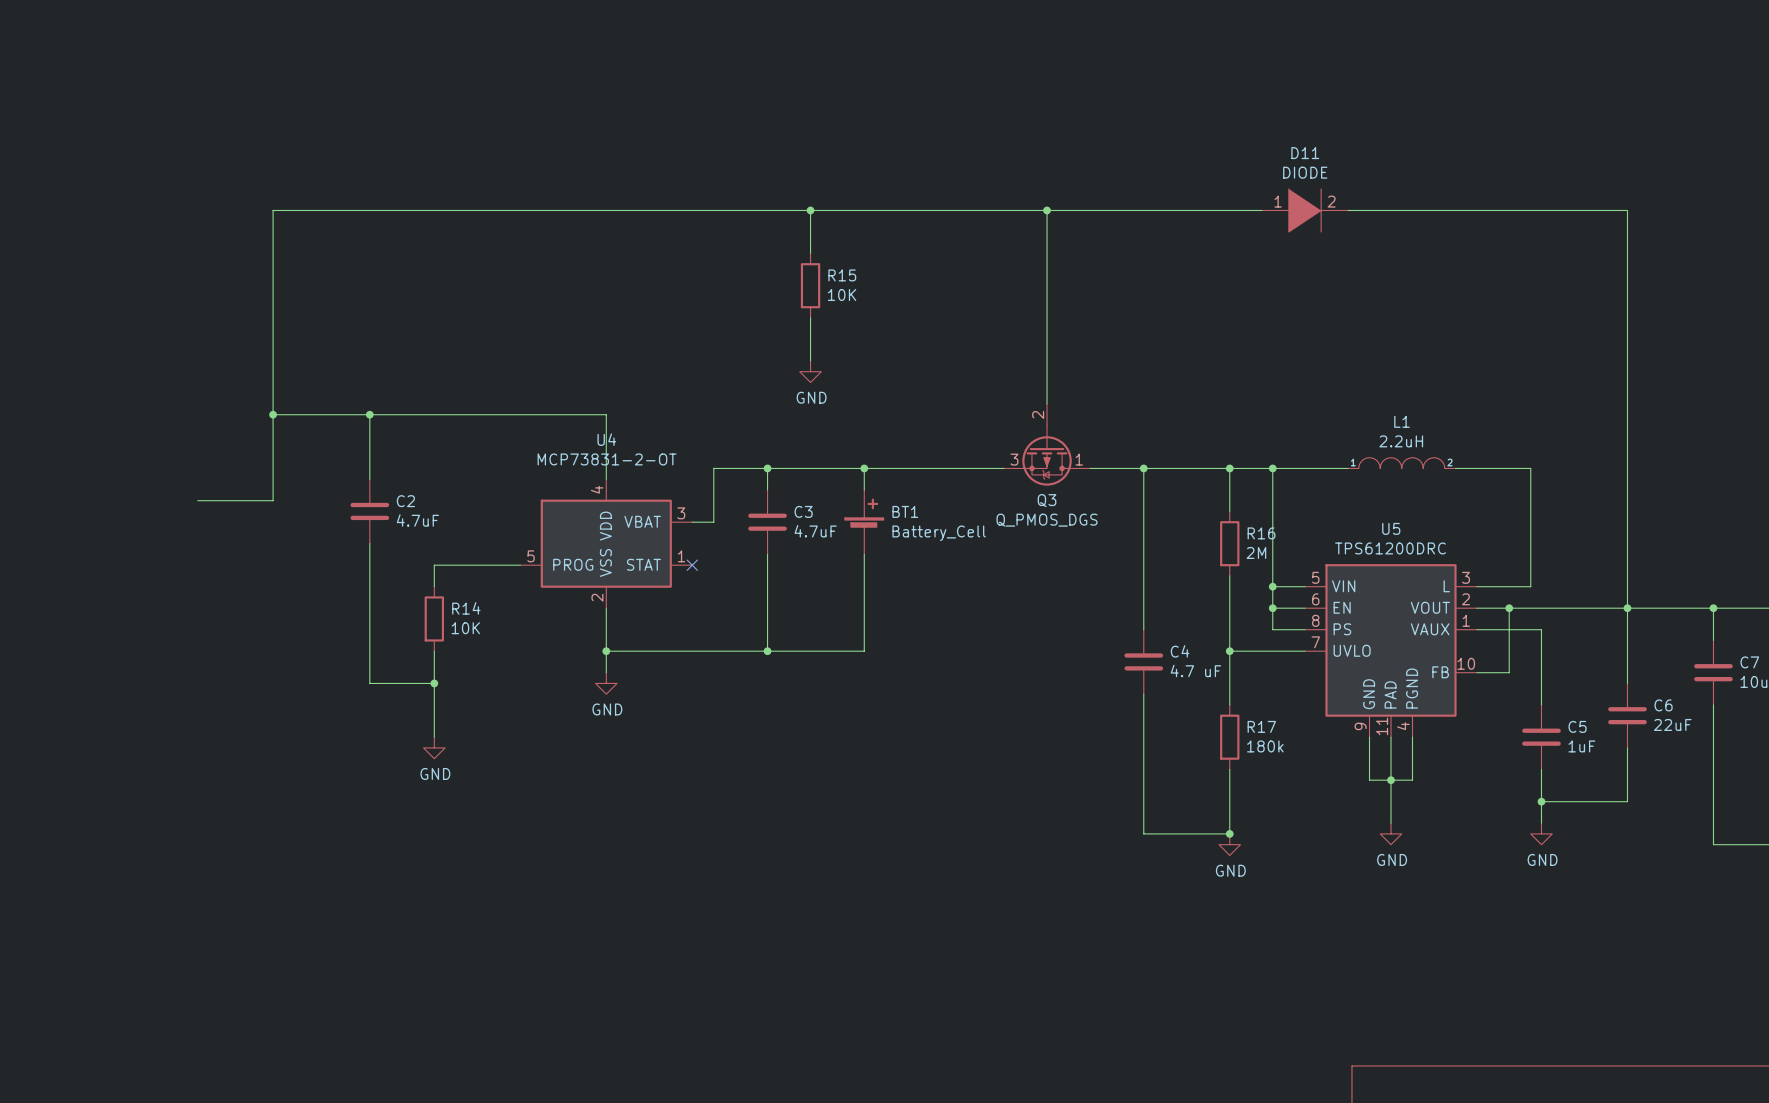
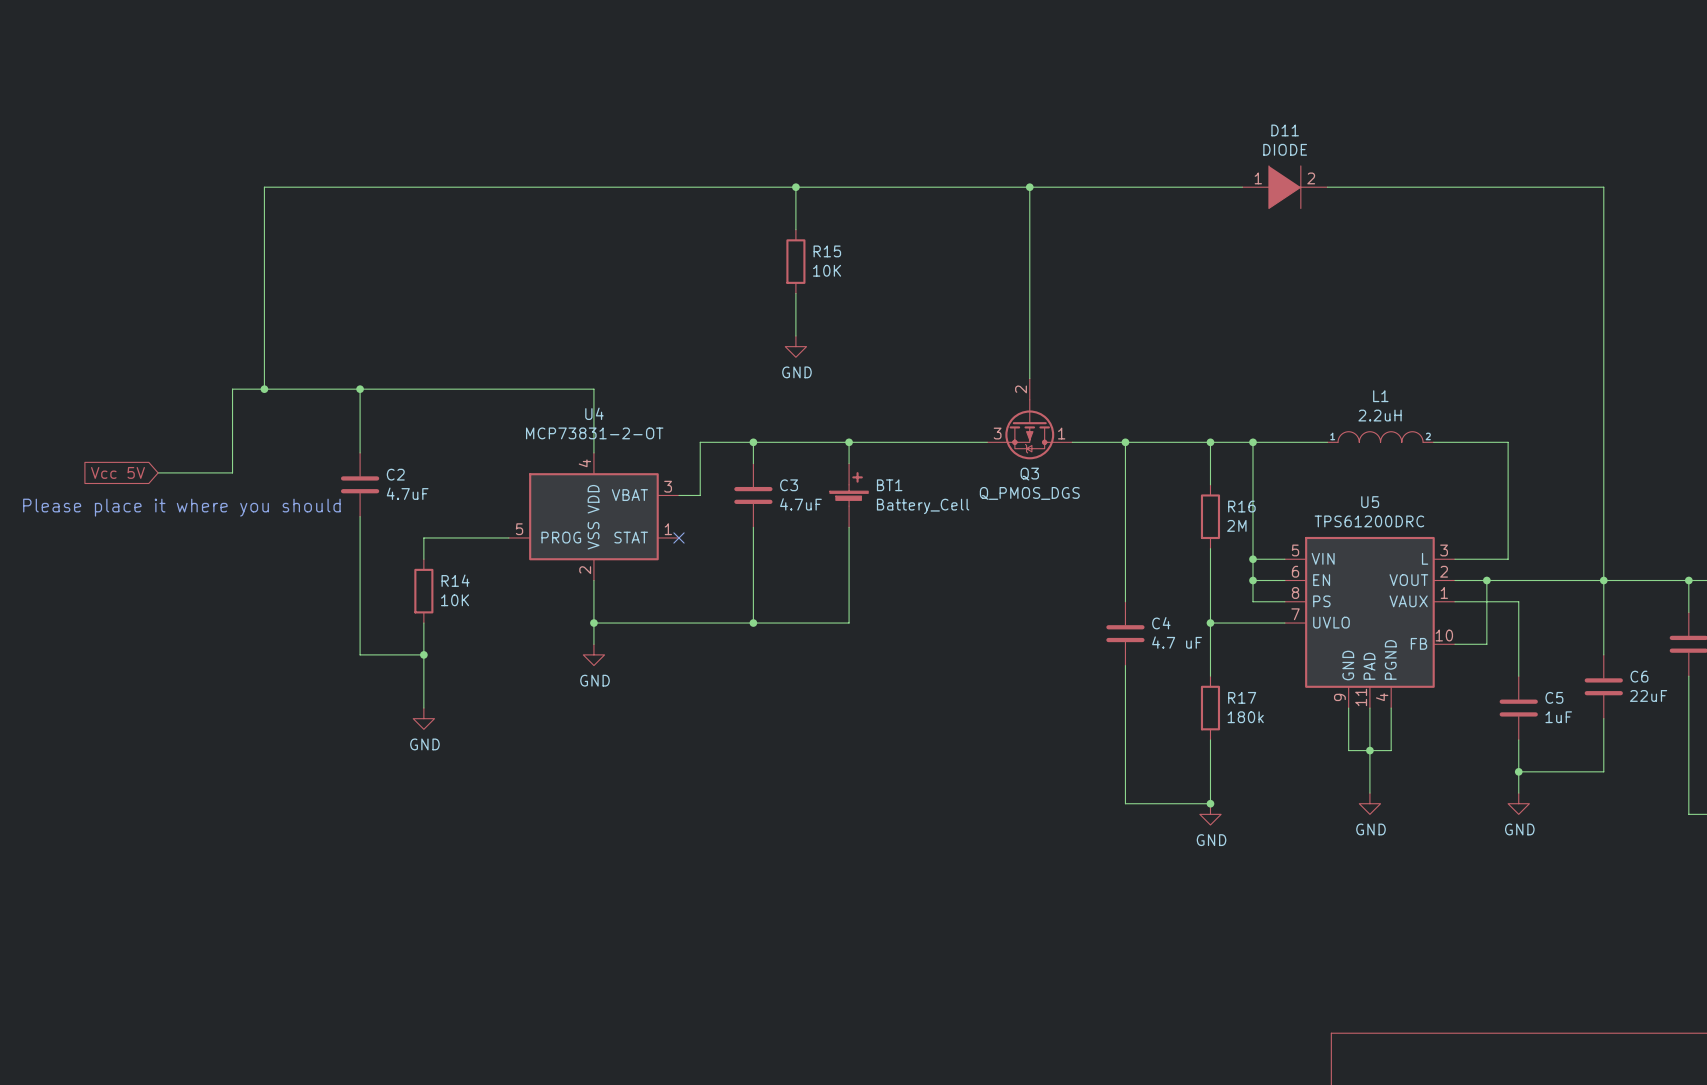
wire: (273, 414) (273, 500) (197, 500) -> (264, 389) (232, 389) (232, 472) (158, 472)
global label: none -> Vcc 5V (117, 472)
text: none -> Please place it where you should (181, 507)

